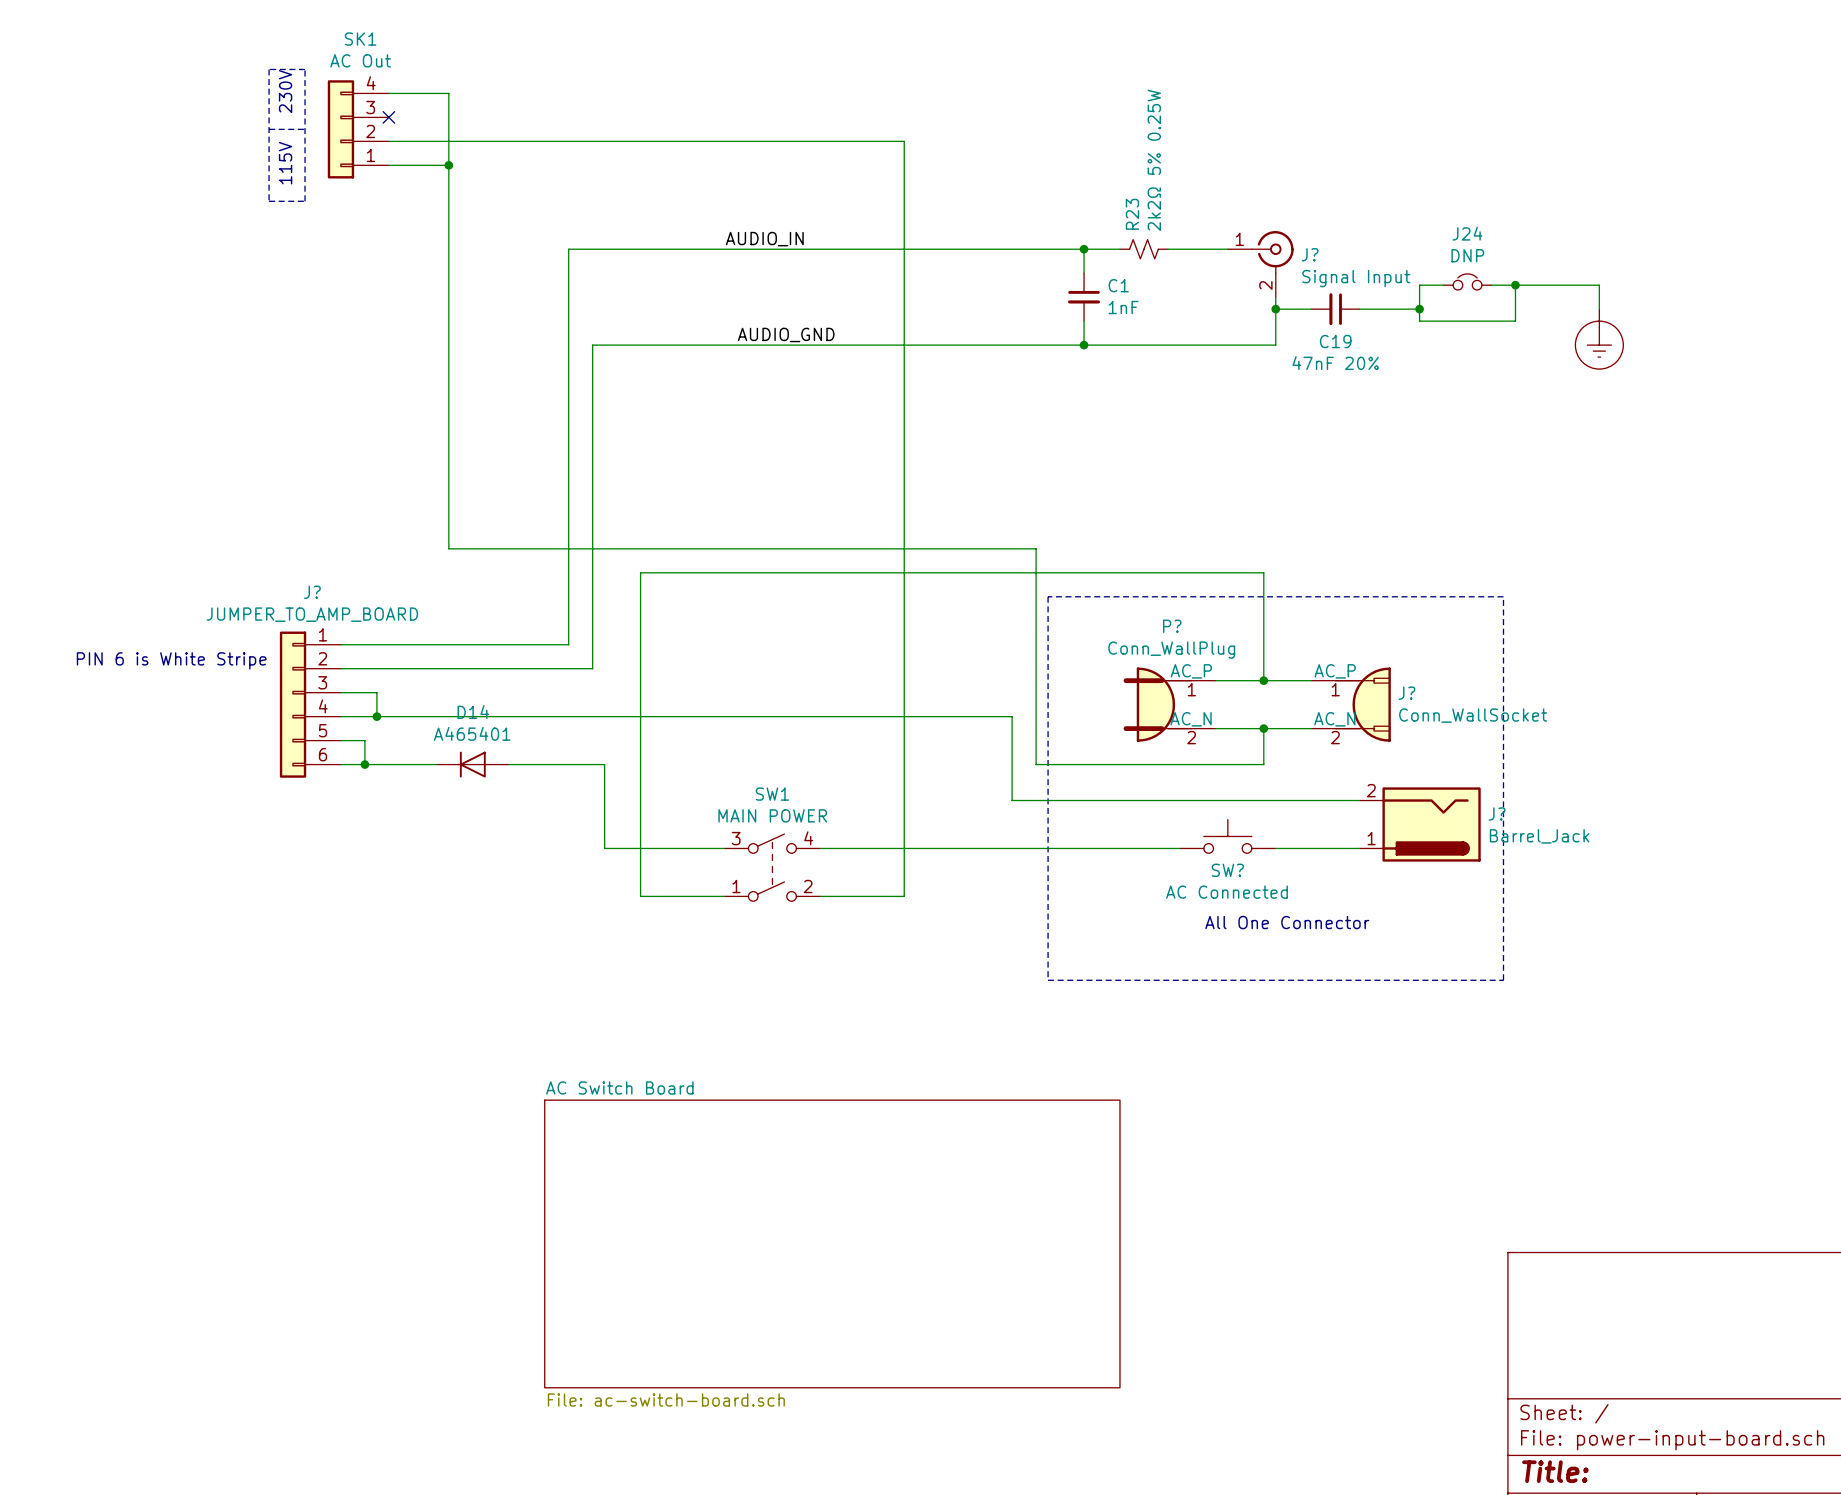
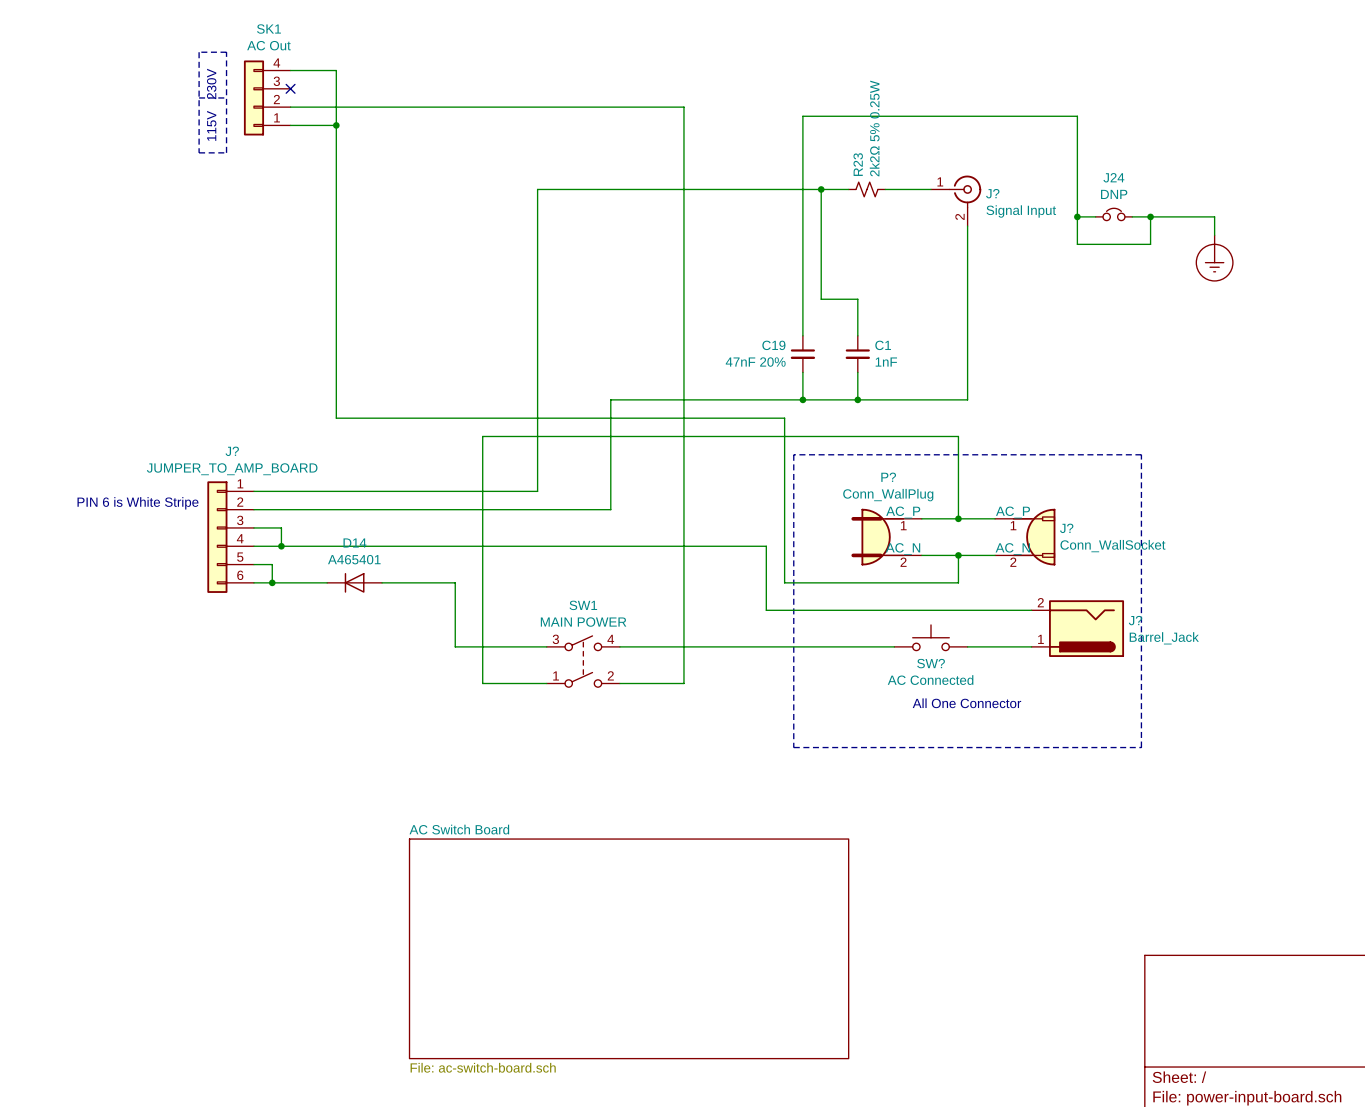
label: AUDIO_IN (764, 239) -> none
wire: (712, 249) (568, 249) (568, 644) -> (537, 189) (537, 491) (427, 491)
wire: none -> (1077, 216) (1077, 116) (802, 116) (802, 335)
C1 position: (1084, 297) -> (857, 354)
wire: (1275, 309) (1311, 309) -> none
junction: (1275, 309) -> none
C19 rotation: 0° (1335, 309) -> 90° counterclockwise (802, 354)
C19 position: (1335, 309) -> (802, 354)
wire: (1359, 309) (1419, 309) -> none
junction position: (1419, 309) -> (1077, 216)
label: AUDIO_GND (786, 334) -> none
C19 name position: C19 (1335, 341) -> C19 (773, 345)
wire: none -> (821, 262) (821, 299) (857, 299) (857, 335)
junction: (1084, 345) -> none
wire: (1275, 345) (592, 345) (592, 668) -> (967, 262) (967, 399) (610, 399) (610, 509) (446, 509)
C19 value position: 47nF 20% (1335, 363) -> 47nF 20% (755, 362)
wire: none -> (802, 372) (802, 399)
wire: none -> (857, 372) (857, 399)
junction: none -> (802, 399)
junction: none -> (857, 399)

